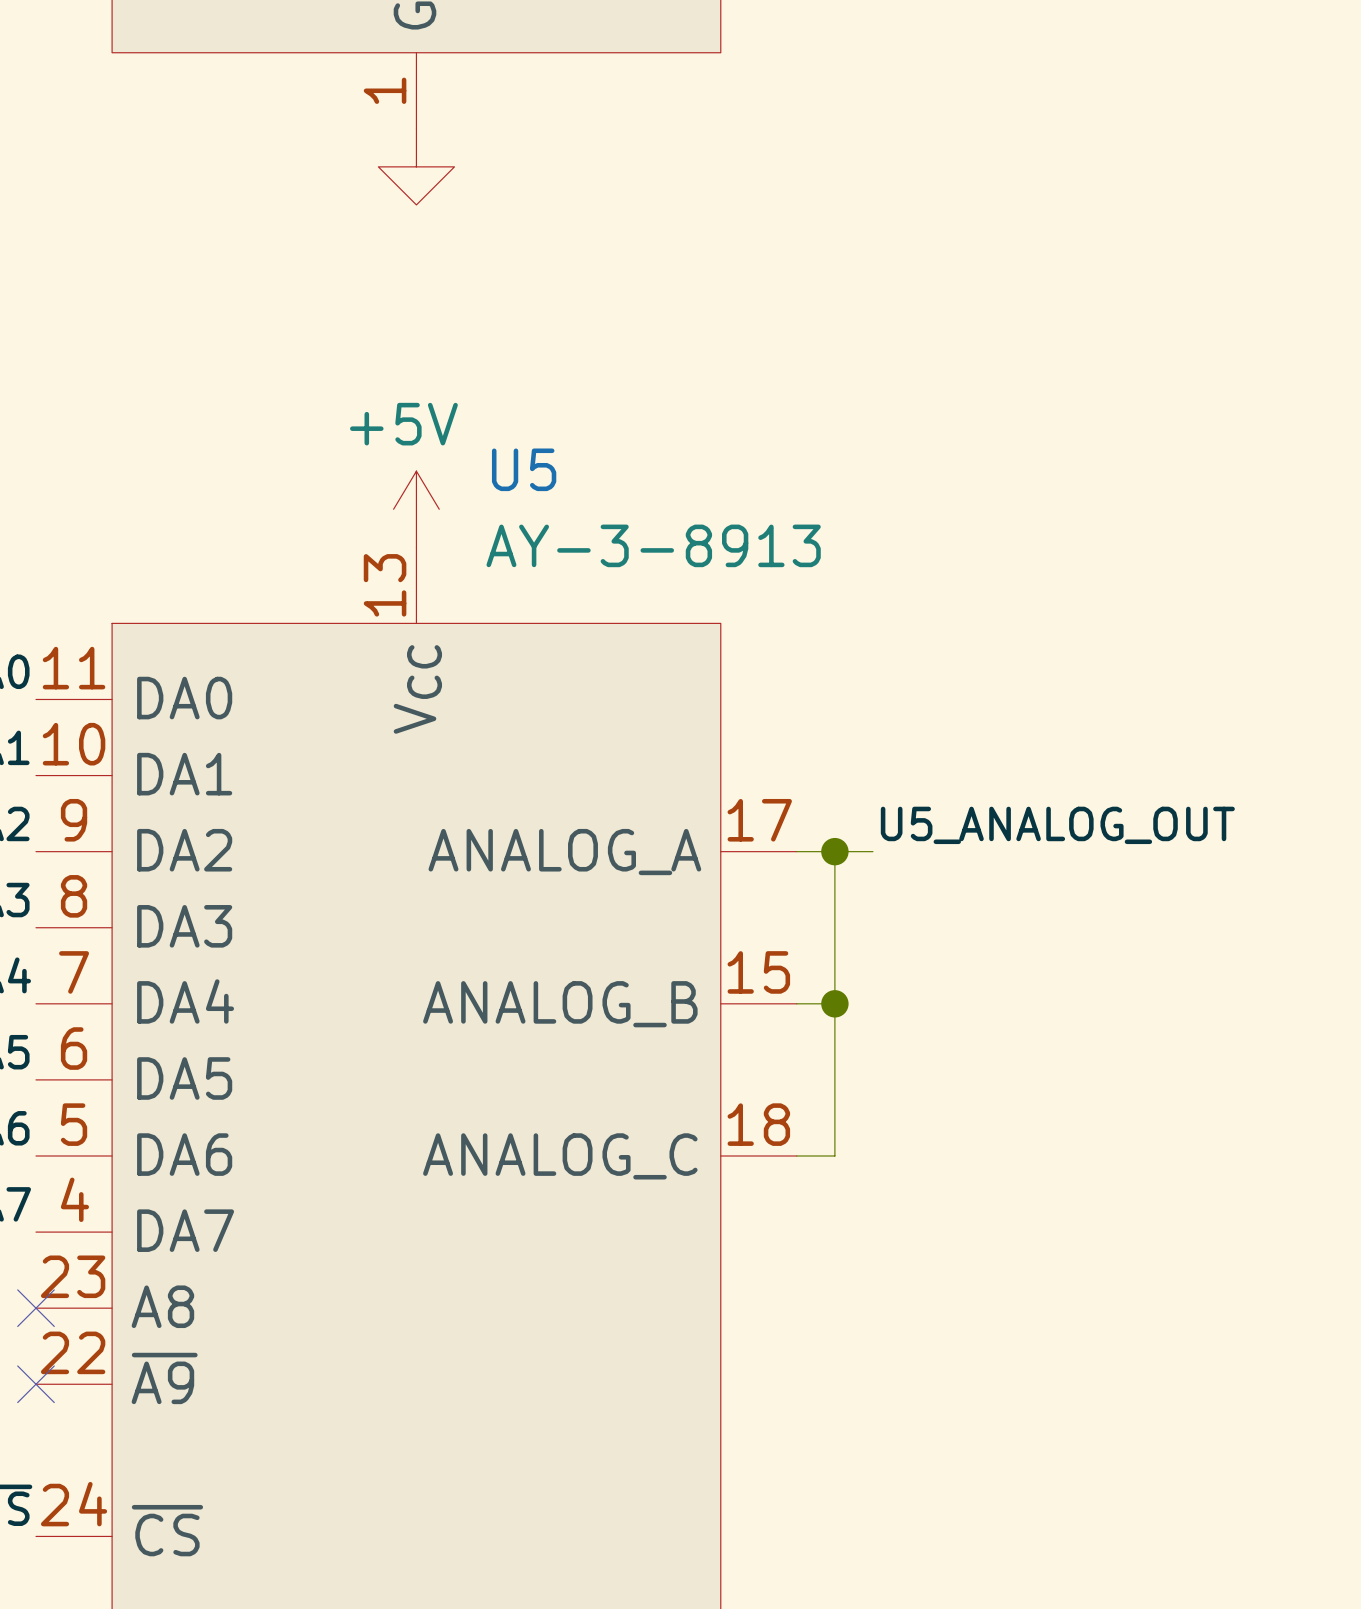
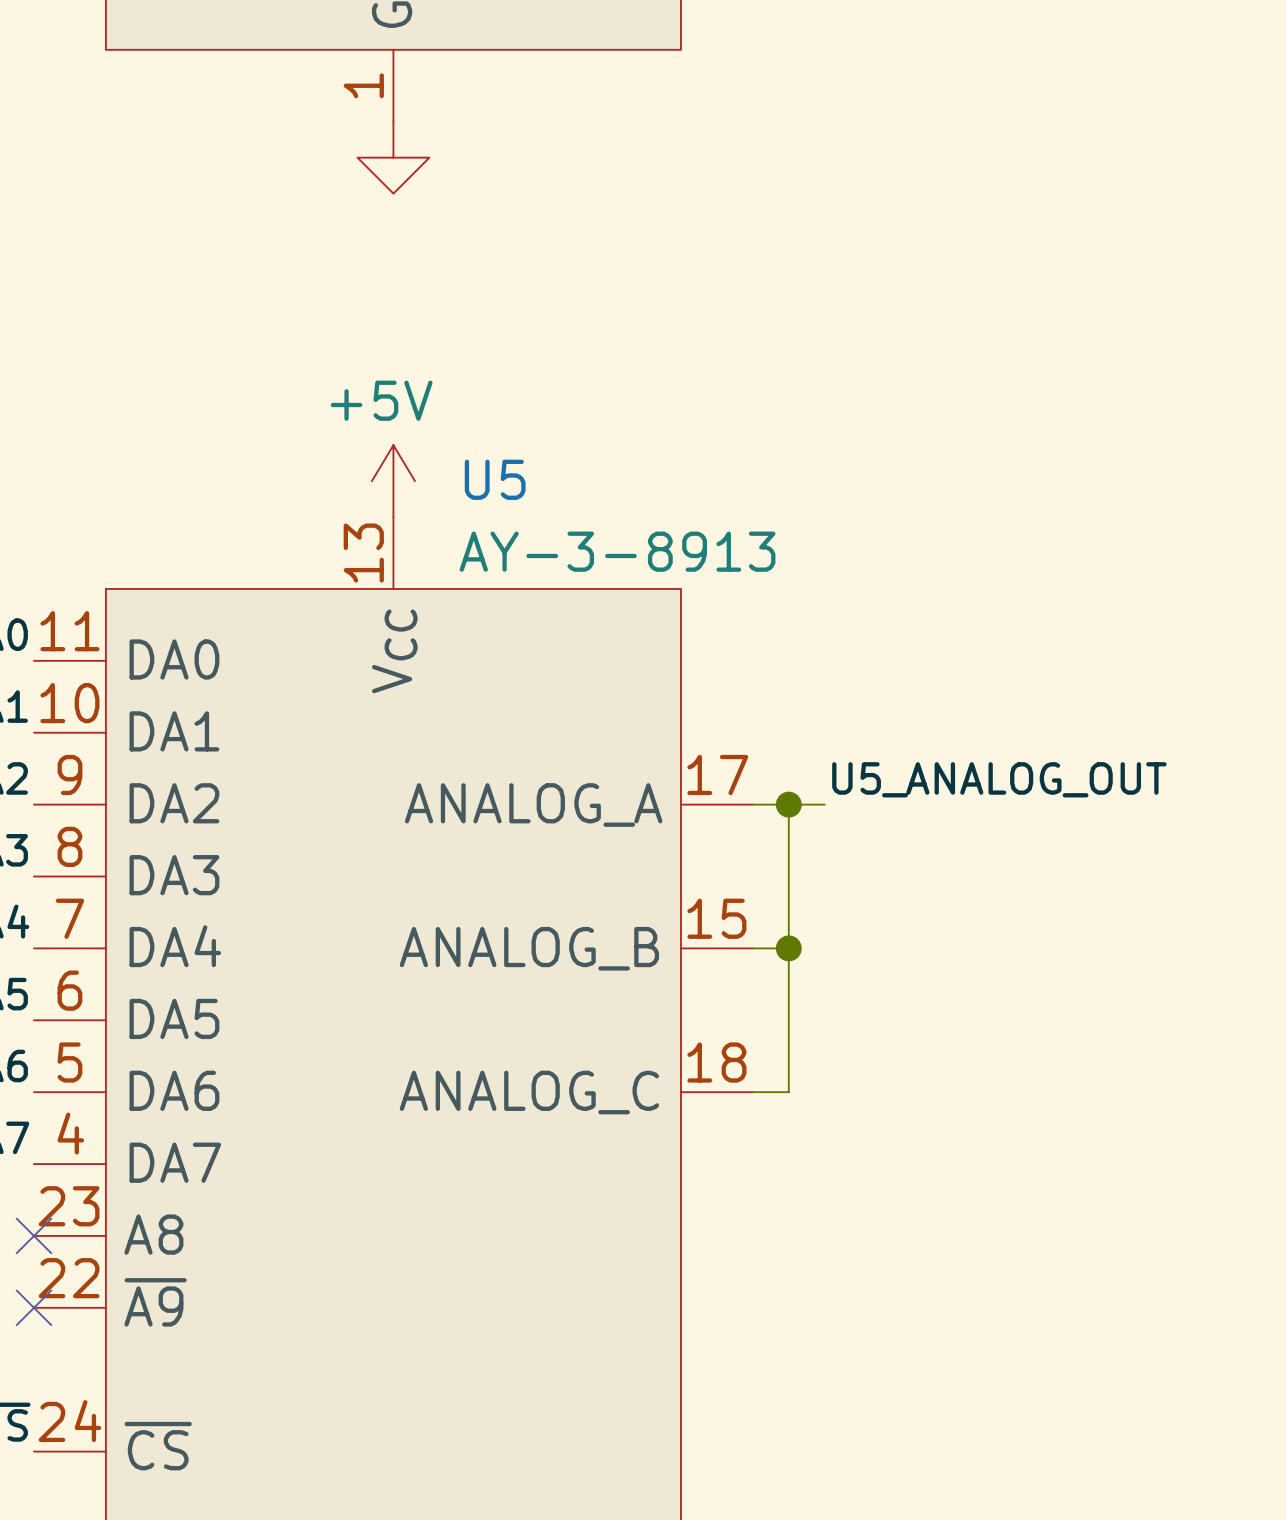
U5 name position: U5 (524, 469) -> U5 (495, 479)
U5 value position: AY-3-8913 (653, 545) -> AY-3-8913 (617, 551)

